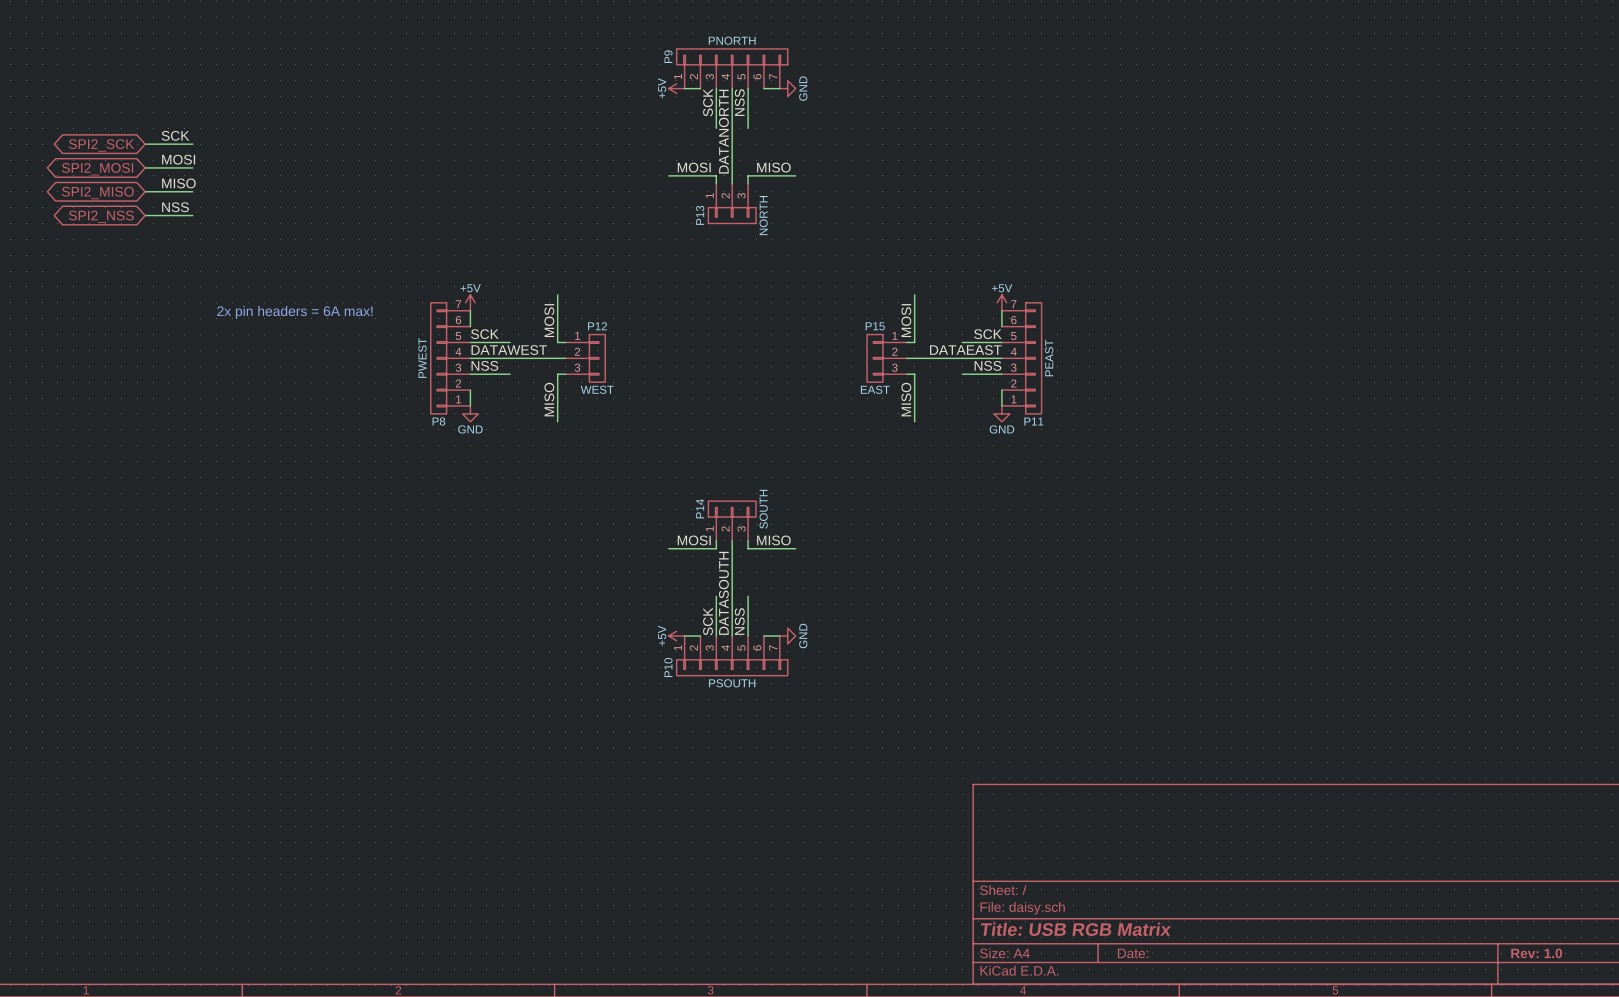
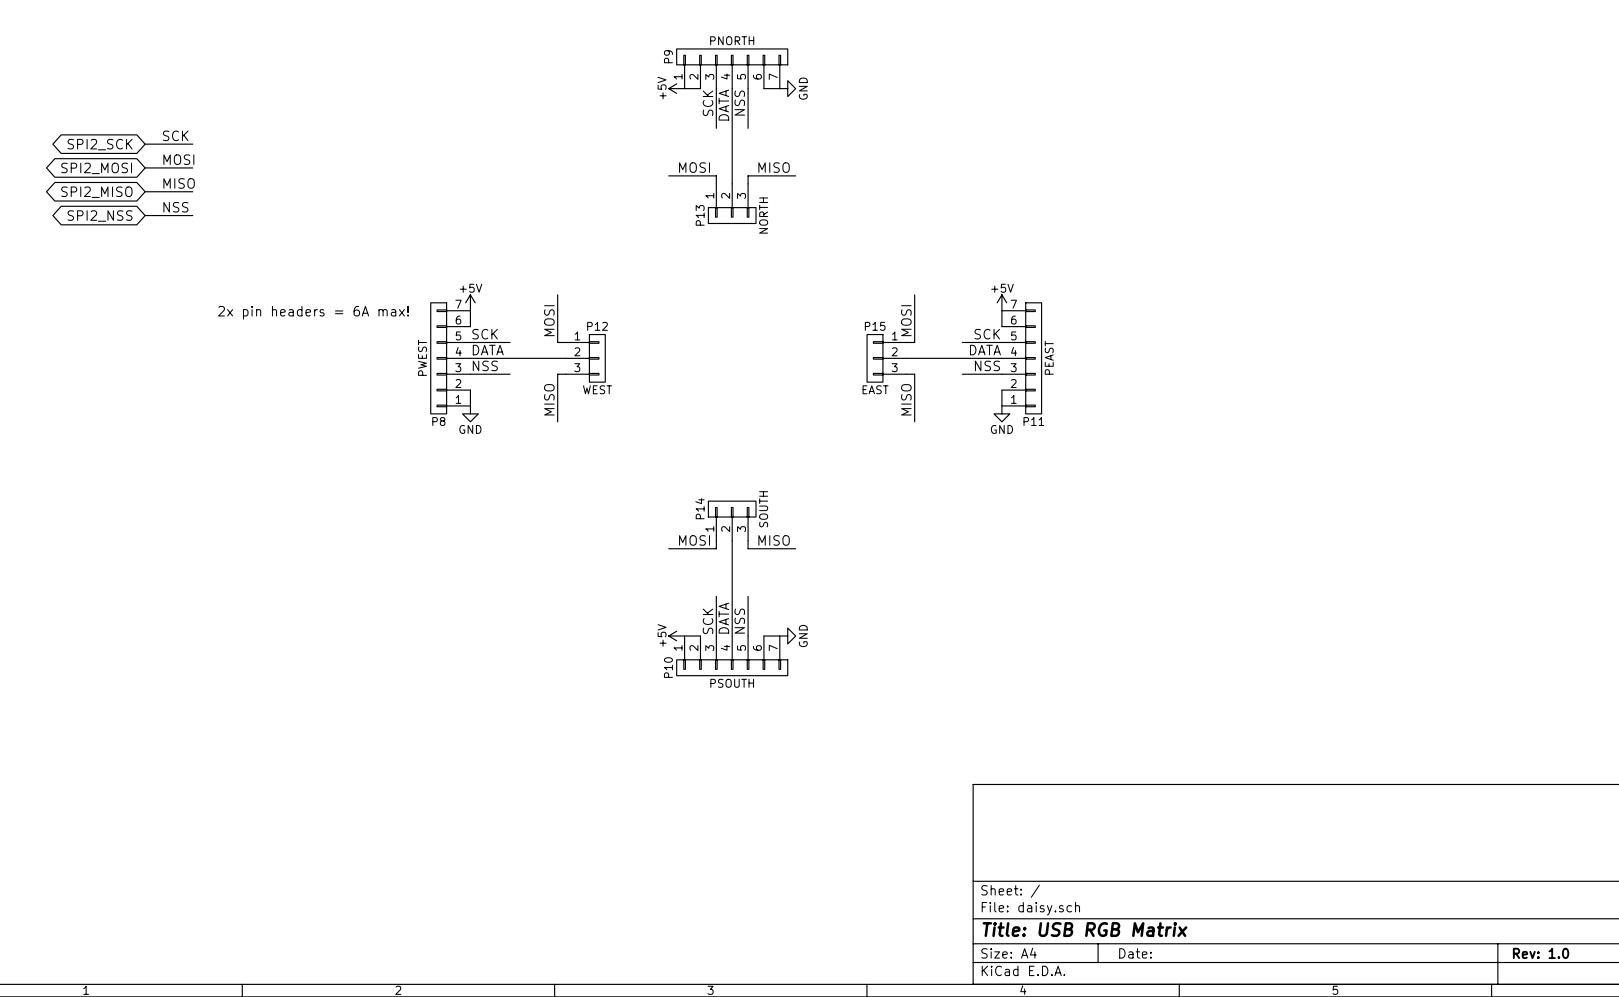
label: DATANORTH (723, 131) -> DATA (723, 105)
label: DATAWEST (509, 350) -> DATA (488, 350)
label: DATAEAST (965, 350) -> DATA (985, 350)
label: DATASOUTH (723, 593) -> DATA (723, 618)

